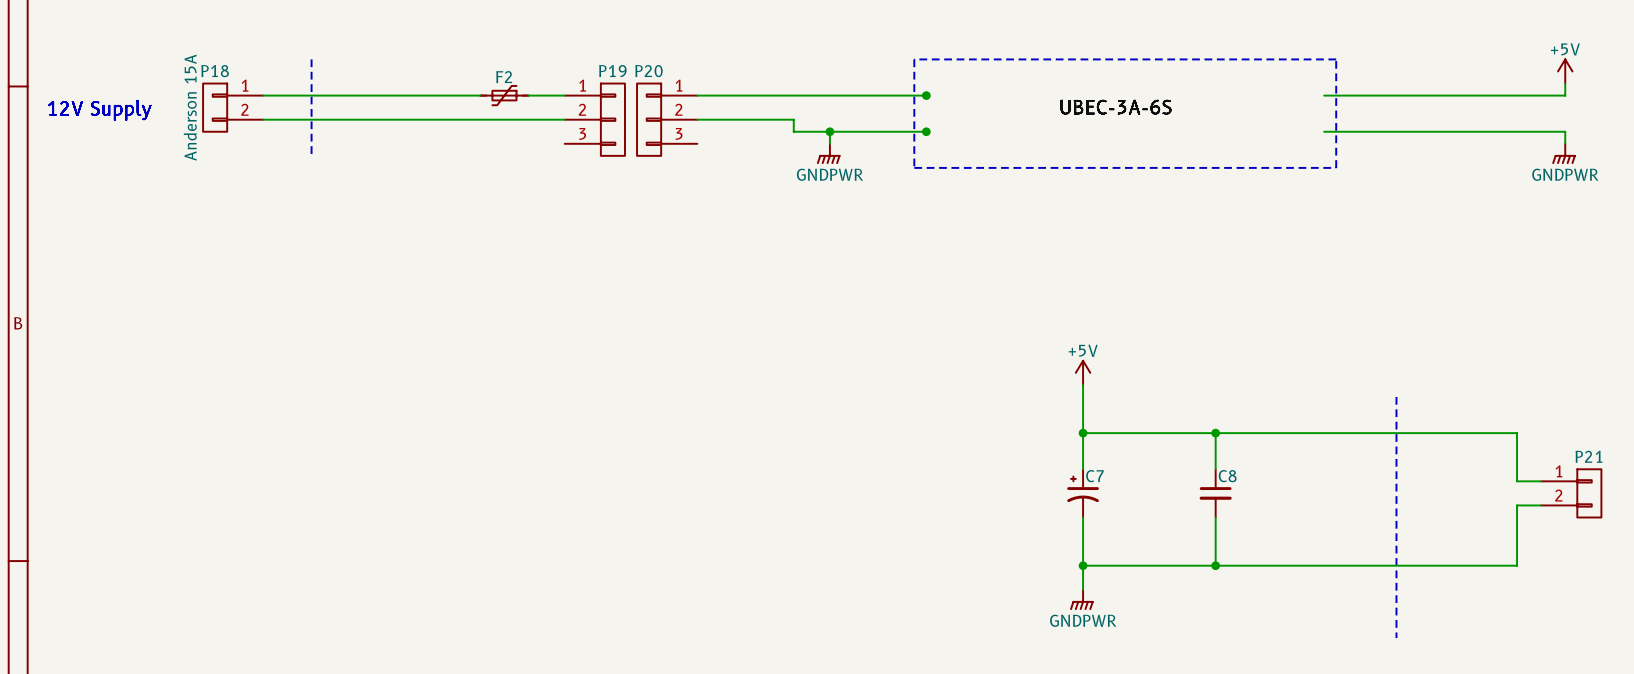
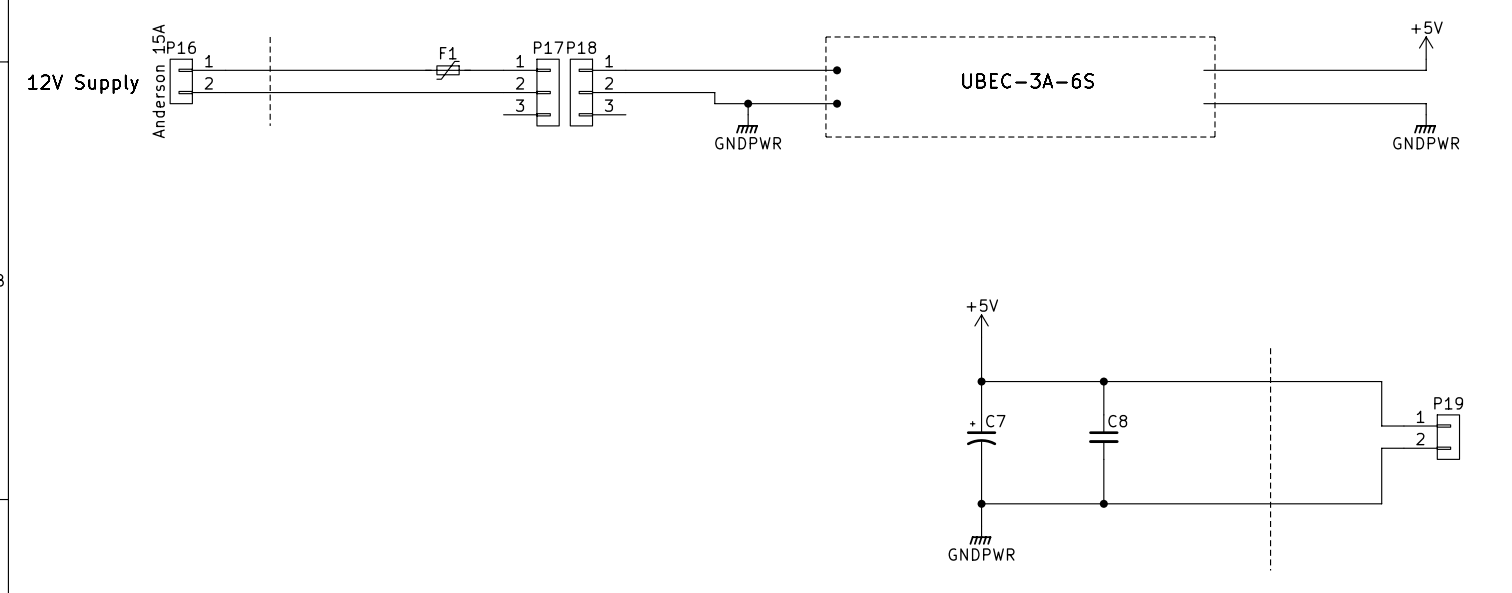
P18 name: P18 (215, 71) -> P16 (181, 47)
P19 name: P19 (612, 71) -> P17 (548, 47)
P20 name: P20 (648, 71) -> P18 (581, 47)
F2 name: F2 (504, 77) -> F1 (448, 53)
P21 name: P21 (1588, 456) -> P19 (1448, 403)

